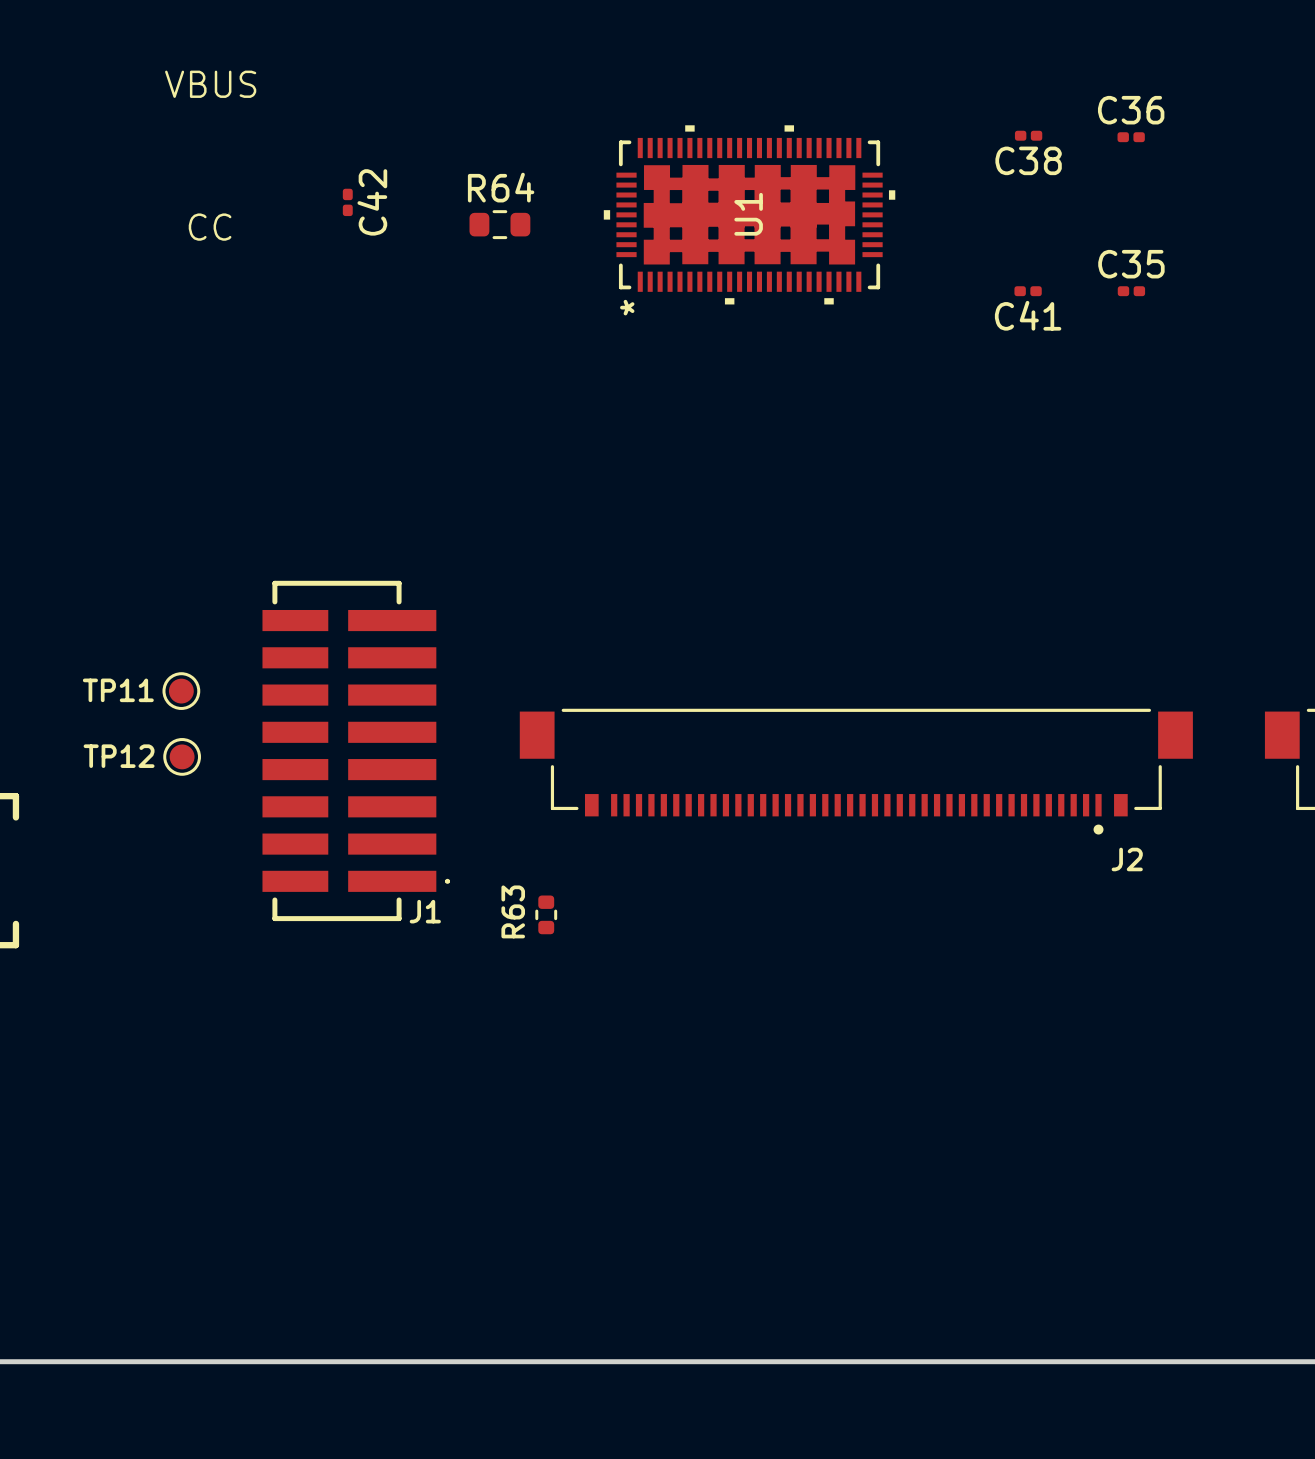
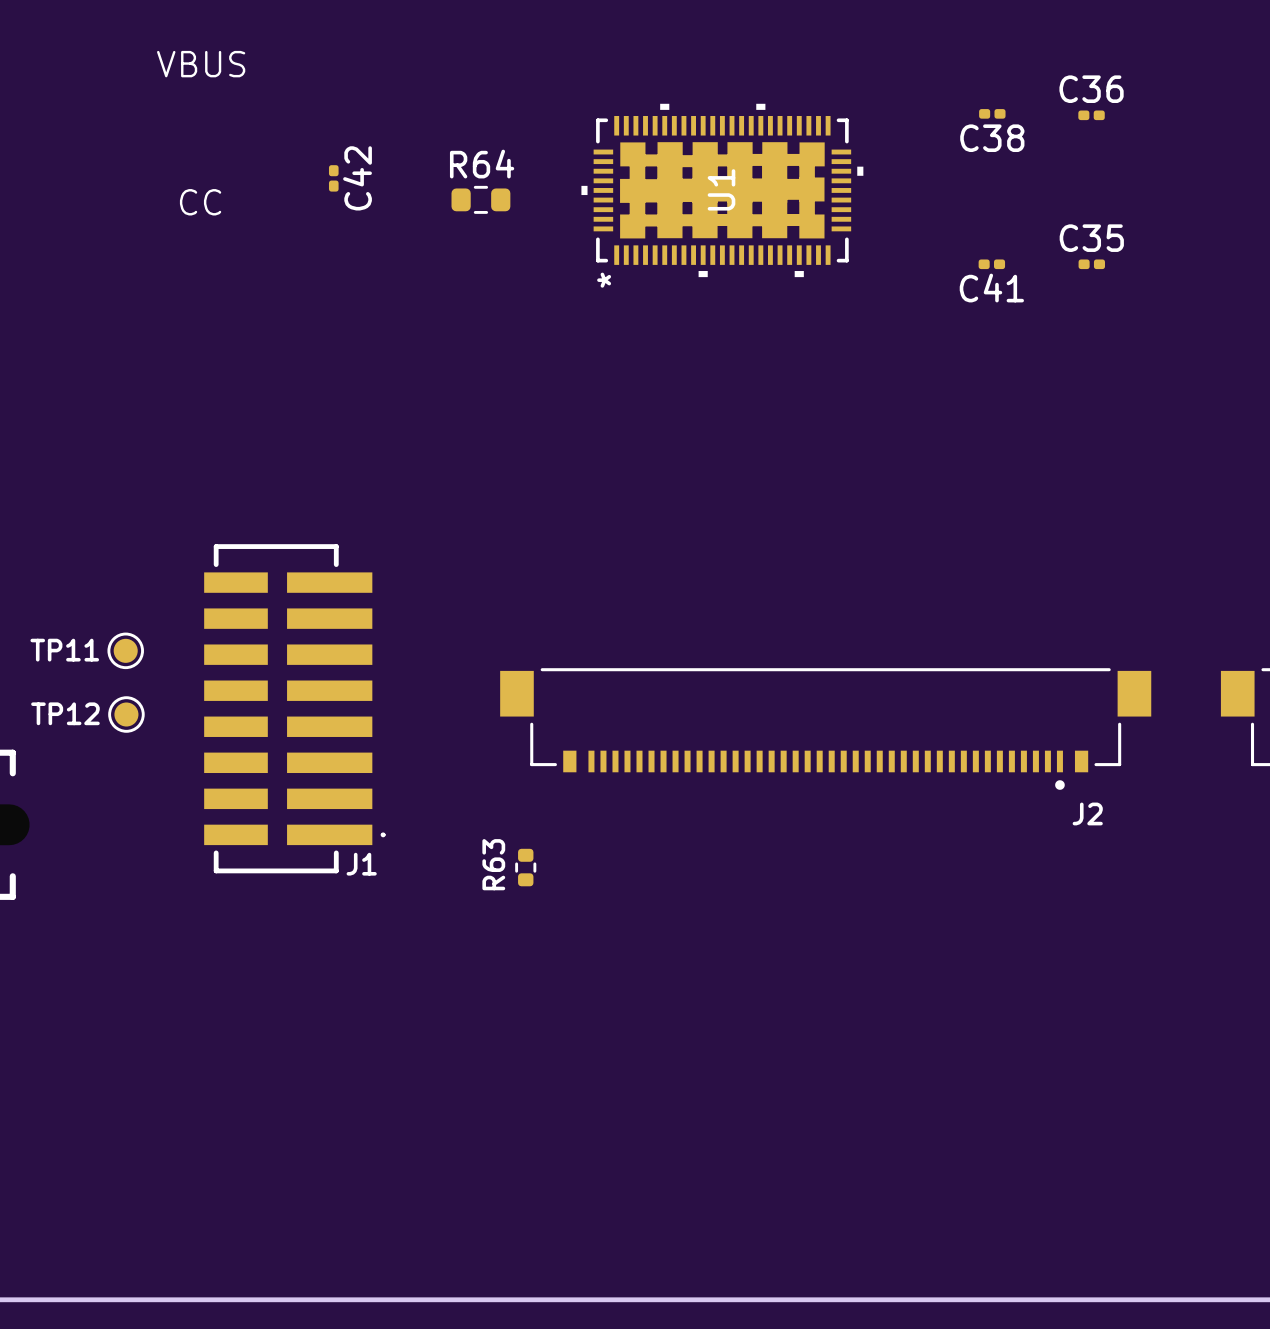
TP11 position: (181, 691) -> (125, 650)
J1 position: (356, 750) -> (294, 708)
TP12 position: (182, 756) -> (126, 714)

